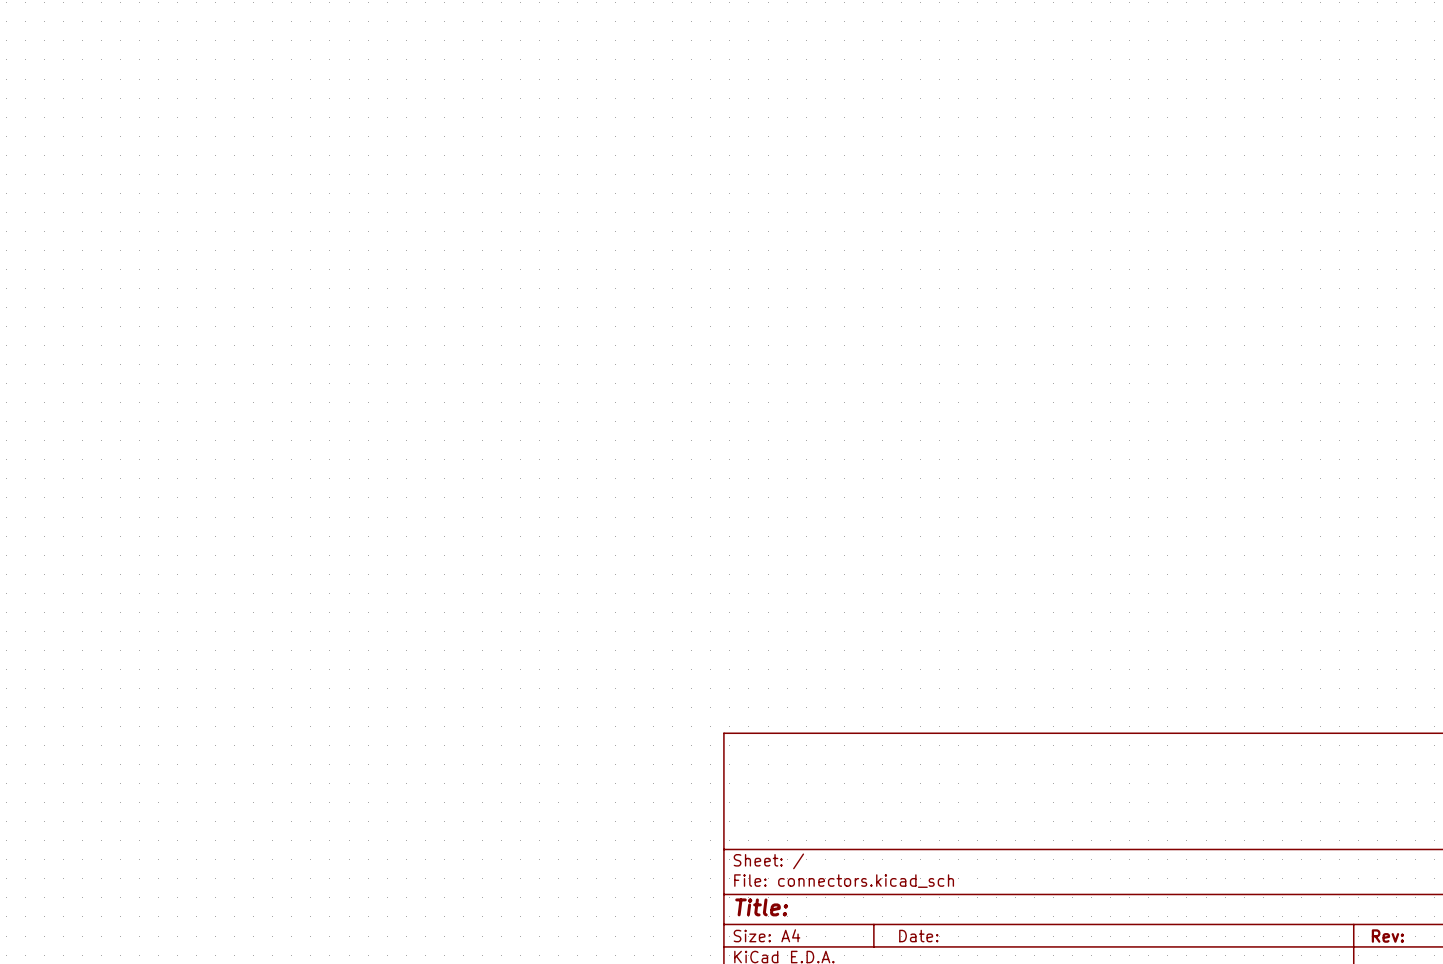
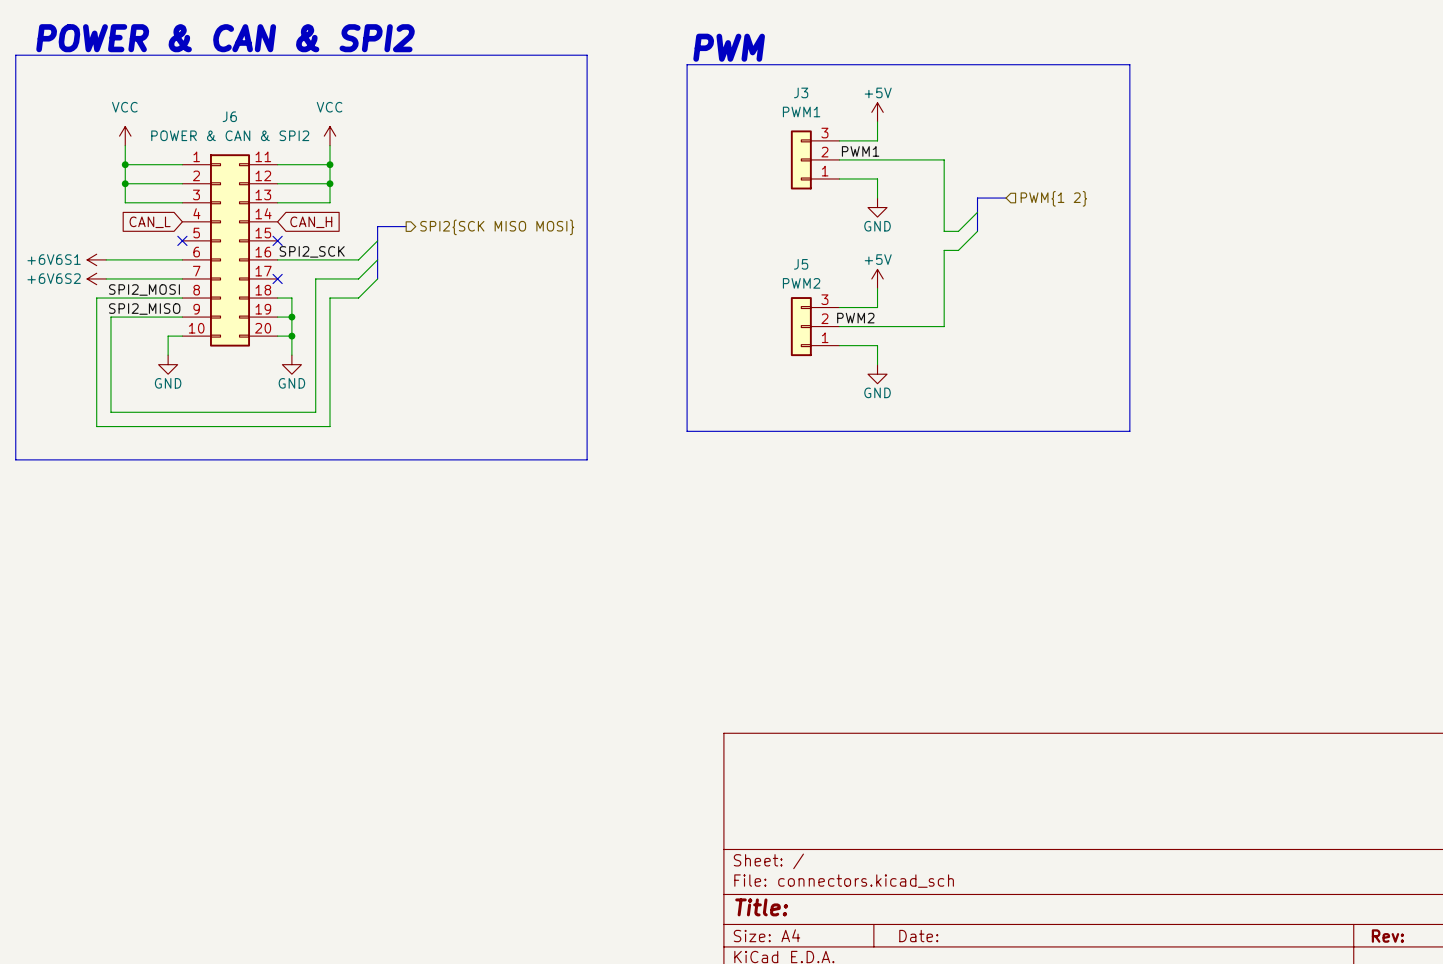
text: none -> POWER & CAN & SPI2 (225, 38)
text: none -> PWM (729, 47)
line: none -> (15, 55) (587, 55) (587, 459) (15, 459) (15, 55)
line: none -> (687, 64) (1129, 64) (1129, 431) (687, 431) (687, 64)
power symbol: none -> +5V (877, 112)
wire: none -> (877, 121) (877, 140) (839, 140)
power symbol: none -> VCC (125, 136)
power symbol: none -> VCC (329, 136)
wire: none -> (125, 145) (125, 202) (182, 202)
wire: none -> (329, 145) (329, 202) (277, 202)
label: none -> PWM1 (860, 151)
J3: none -> PWM1 (815, 159)
wire: none -> (839, 159) (944, 159) (944, 231) (958, 231) (977, 212)
wire: none -> (125, 164) (182, 164)
junction: none -> (125, 164)
wire: none -> (277, 164) (329, 164)
junction: none -> (329, 164)
wire: none -> (839, 178) (877, 178) (877, 198)
wire: none -> (125, 183) (182, 183)
junction: none -> (125, 183)
wire: none -> (277, 183) (329, 183)
junction: none -> (329, 183)
bus: none -> (1006, 198) (977, 198) (977, 231)
hierarchical label: none -> PWM{1 2} (1053, 198)
power symbol: none -> GND (877, 207)
global label: none -> CAN_L (150, 222)
global label: none -> CAN_H (311, 222)
bus: none -> (406, 226) (377, 226) (377, 278)
hierarchical label: none -> SPI2{SCK MISO MOSI} (497, 227)
wire: none -> (977, 231) (958, 250) (944, 250) (944, 326) (839, 326)
no-connect mark: none -> (182, 240)
no-connect mark: none -> (277, 240)
wire: none -> (377, 240) (358, 259) (277, 259)
J6: none -> POWER & CAN & SPI2 (230, 250)
label: none -> SPI2_SCK (312, 251)
power symbol: none -> +6V6S1 (96, 259)
wire: none -> (106, 259) (182, 259)
wire: none -> (377, 259) (358, 278) (315, 278) (315, 412) (110, 412) (110, 317) (182, 317)
power symbol: none -> +6V6S2 (96, 278)
wire: none -> (106, 278) (182, 278)
no-connect mark: none -> (277, 278)
wire: none -> (377, 278) (358, 298) (329, 298) (329, 426) (96, 426) (96, 298) (182, 298)
power symbol: none -> +5V (877, 278)
wire: none -> (877, 288) (877, 307) (839, 307)
label: none -> SPI2_MOSI (144, 289)
wire: none -> (277, 298) (291, 298) (291, 355)
label: none -> SPI2_MISO (144, 309)
wire: none -> (277, 317) (291, 317)
junction: none -> (291, 317)
label: none -> PWM2 (855, 318)
J5: none -> PWM2 (815, 326)
wire: none -> (182, 336) (168, 336) (168, 355)
wire: none -> (277, 336) (291, 336)
junction: none -> (291, 336)
wire: none -> (839, 345) (877, 345) (877, 364)
power symbol: none -> GND (168, 364)
power symbol: none -> GND (291, 364)
power symbol: none -> GND (877, 374)

